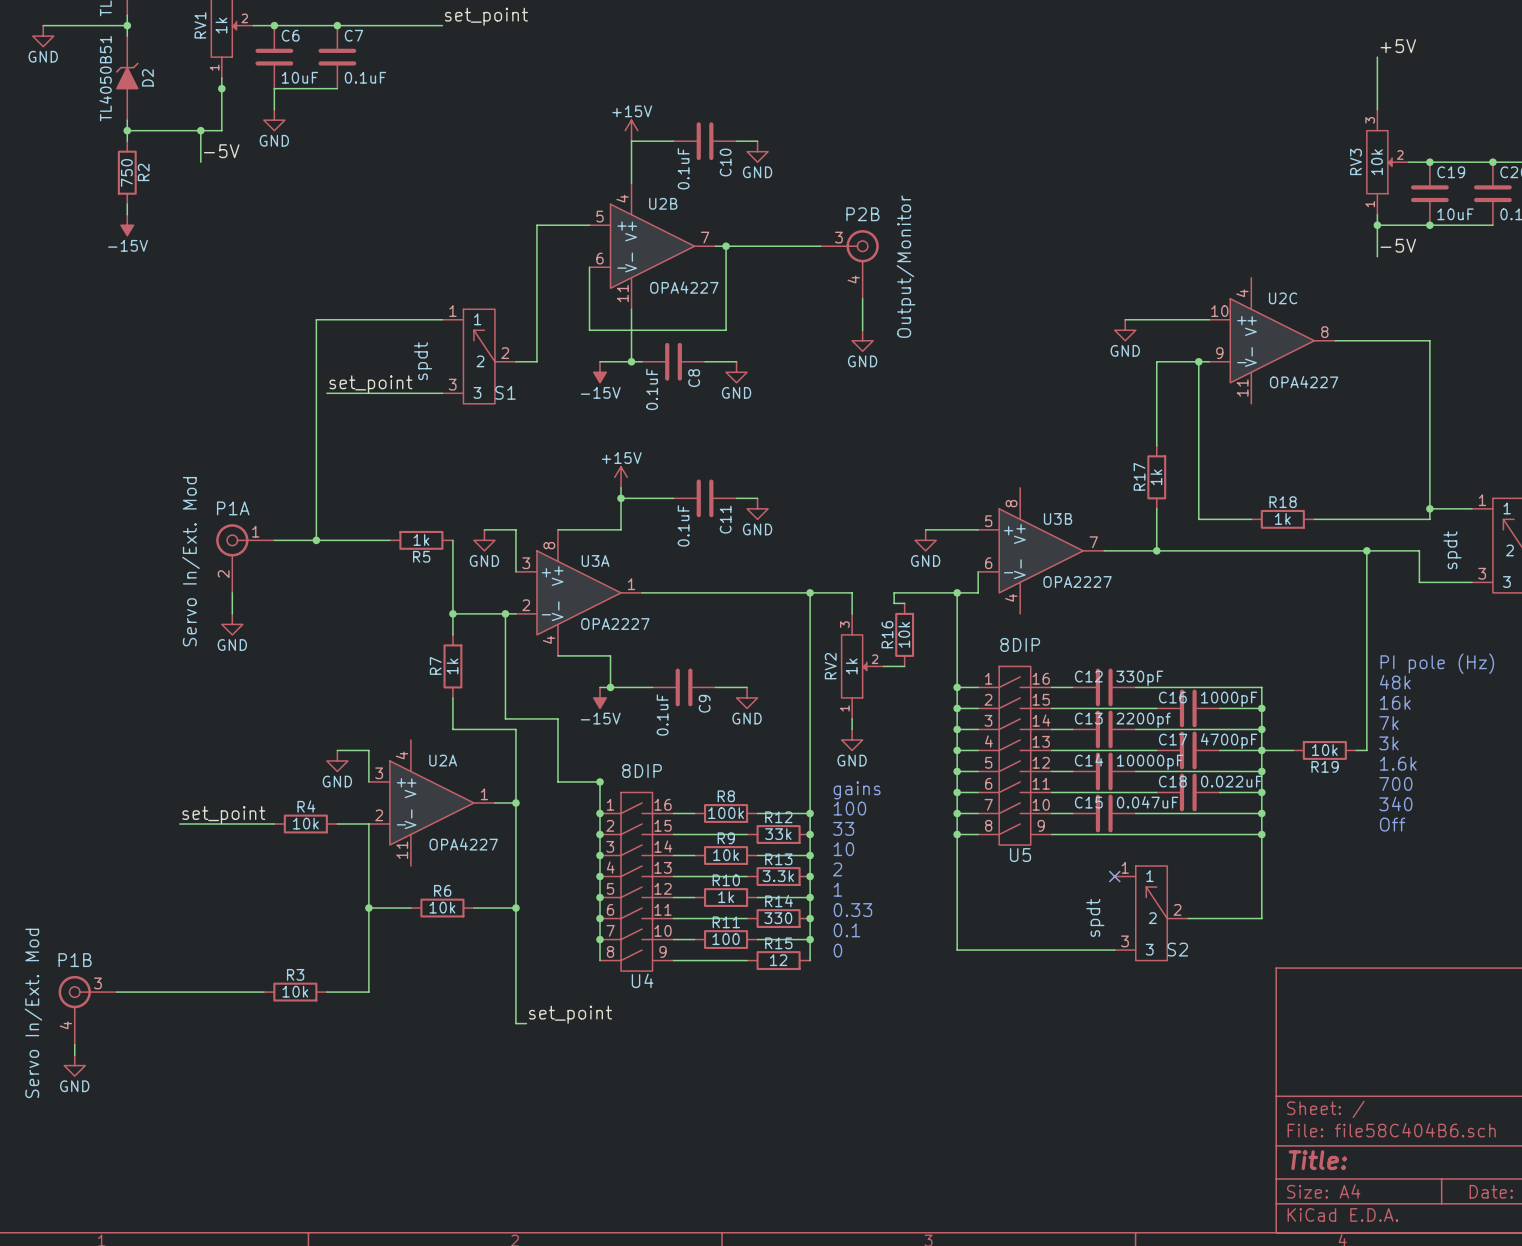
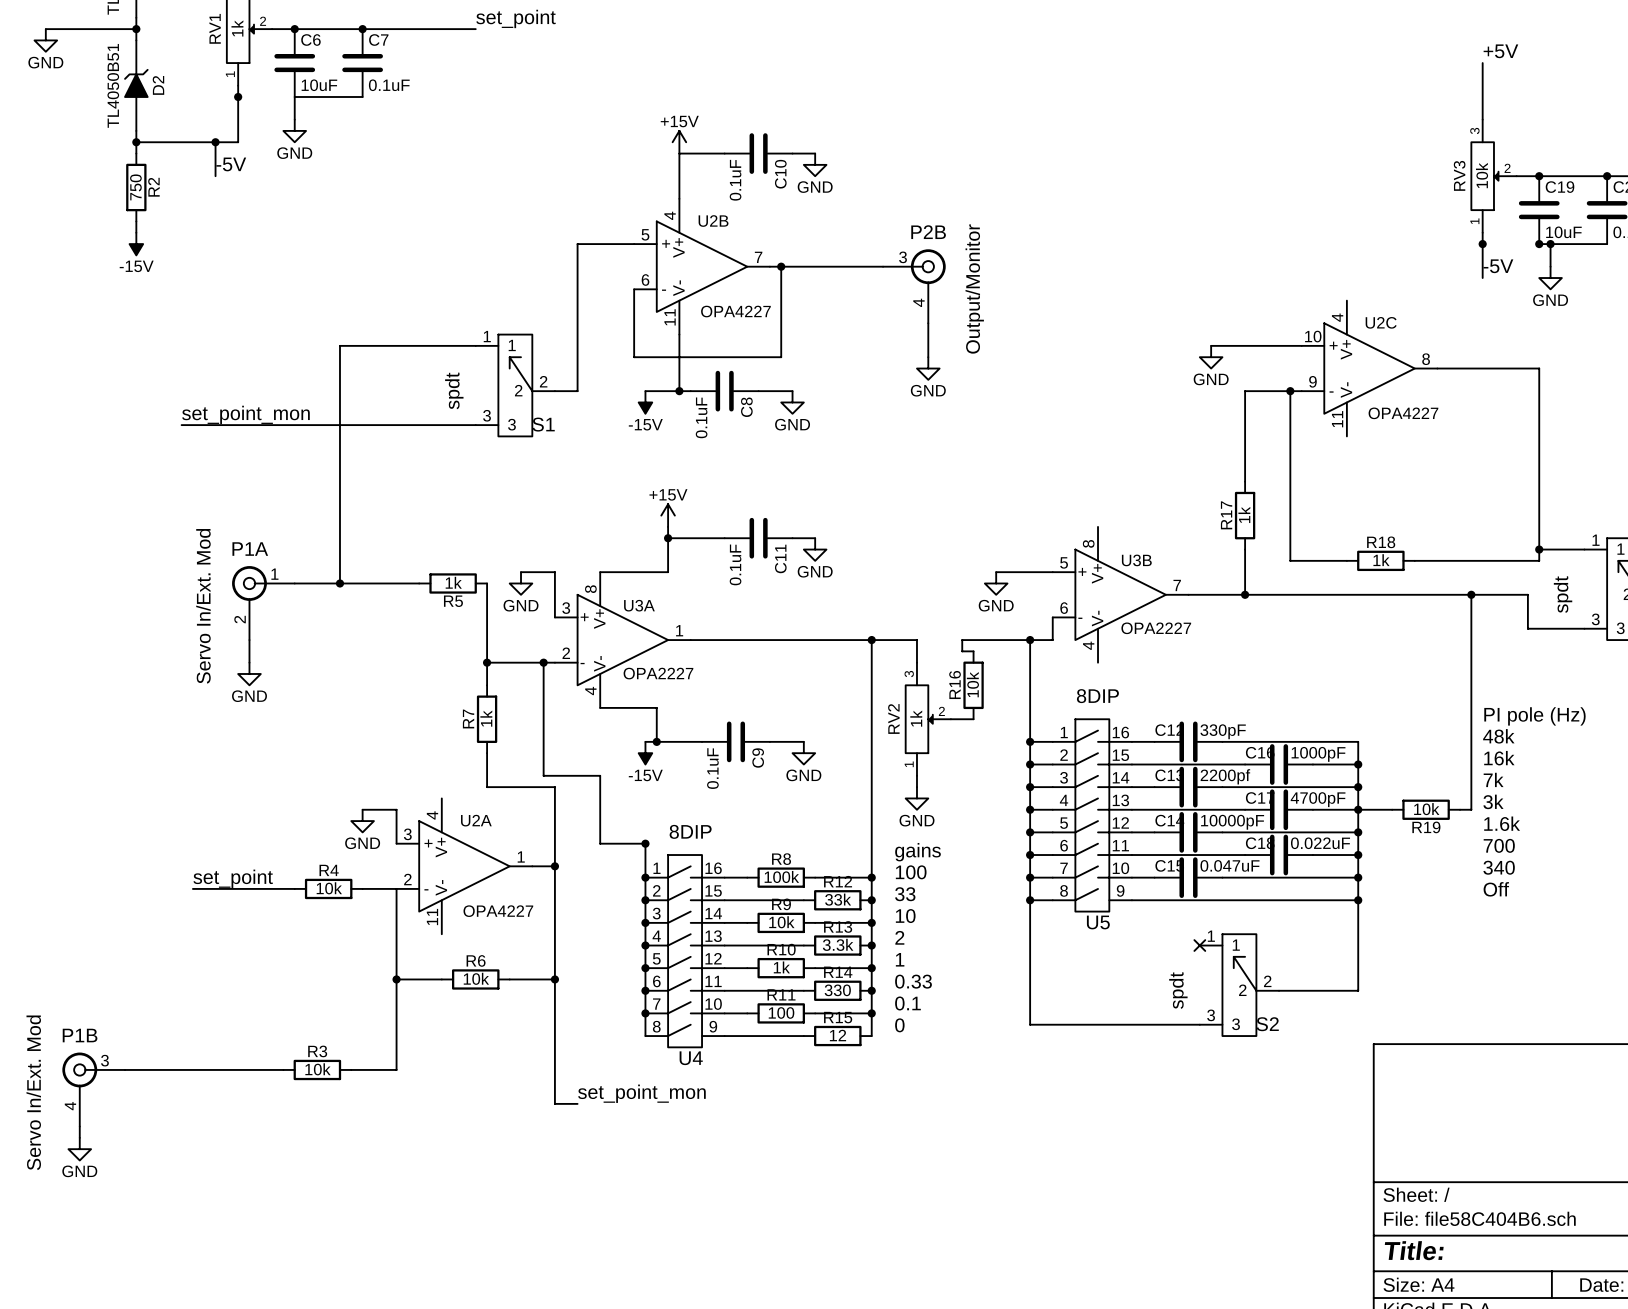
wire: (1377, 225) (1429, 225) -> none
wire: none -> (1550, 244) (1550, 266)
junction: none -> (1550, 244)
power symbol: none -> GND (1550, 278)
label: set_point (370, 384) -> set_point_mon (245, 414)
wire: none -> (181, 425) (351, 425)
label: set_point (570, 1014) -> set_point_mon (641, 1093)
wire: none -> (566, 1103) (577, 1103)

